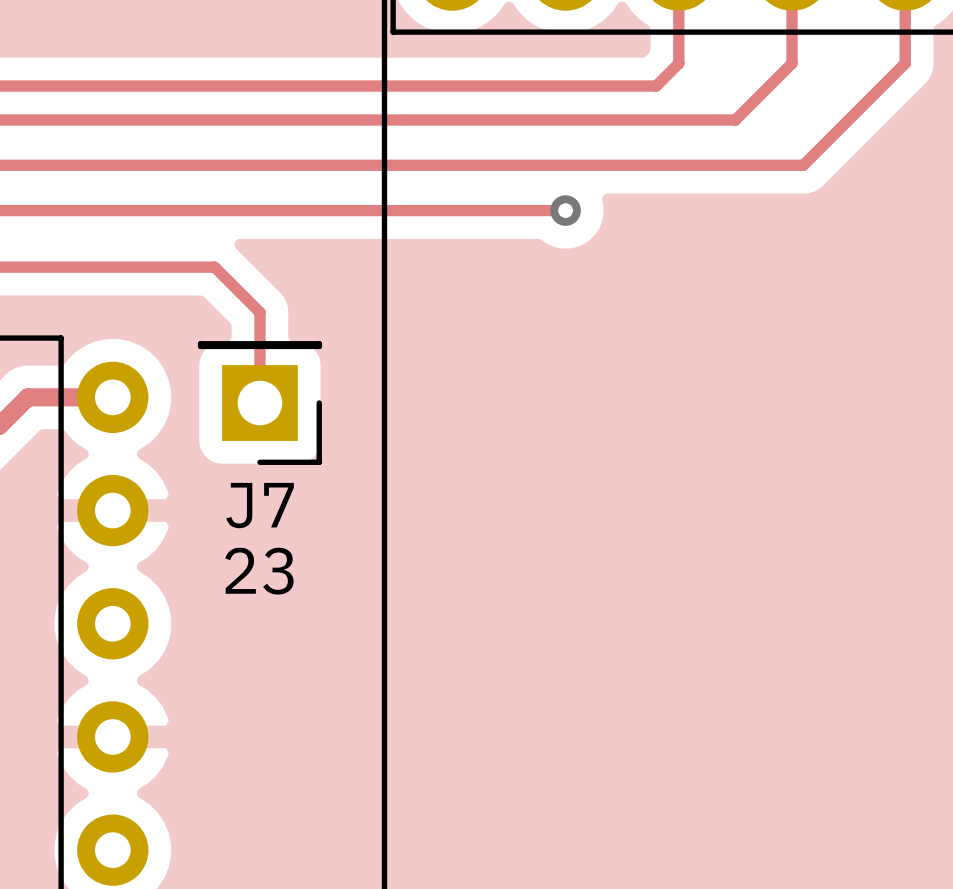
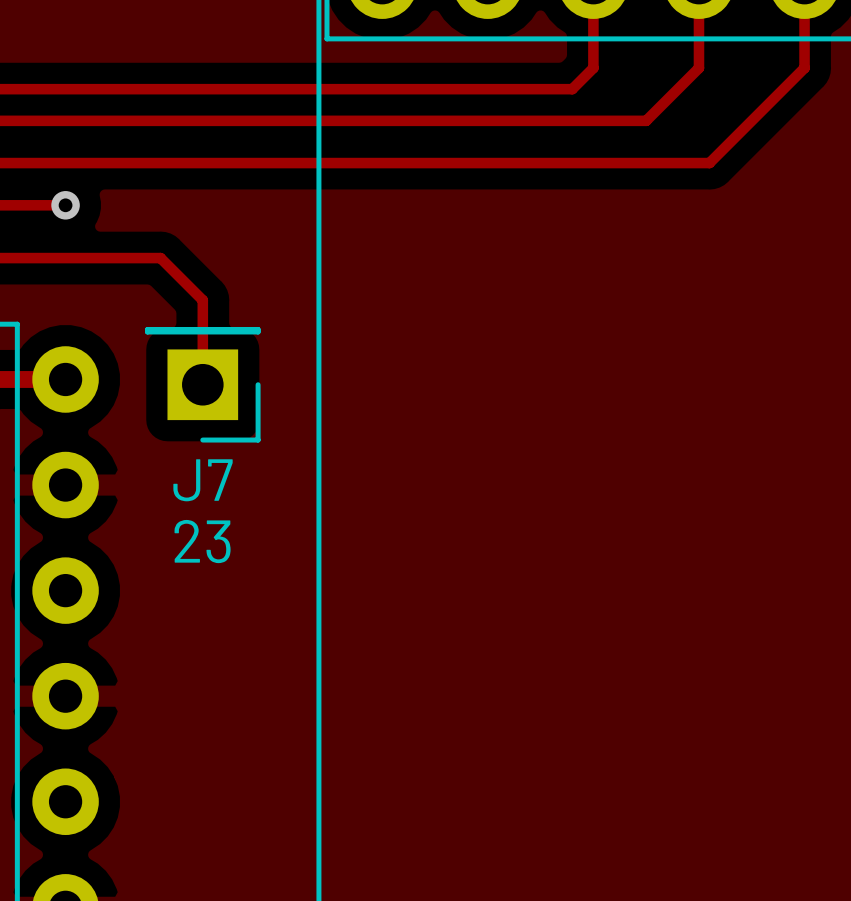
track: (112, 210) (565, 210) -> none
via: none -> (65, 205)
via: (565, 210) -> none

